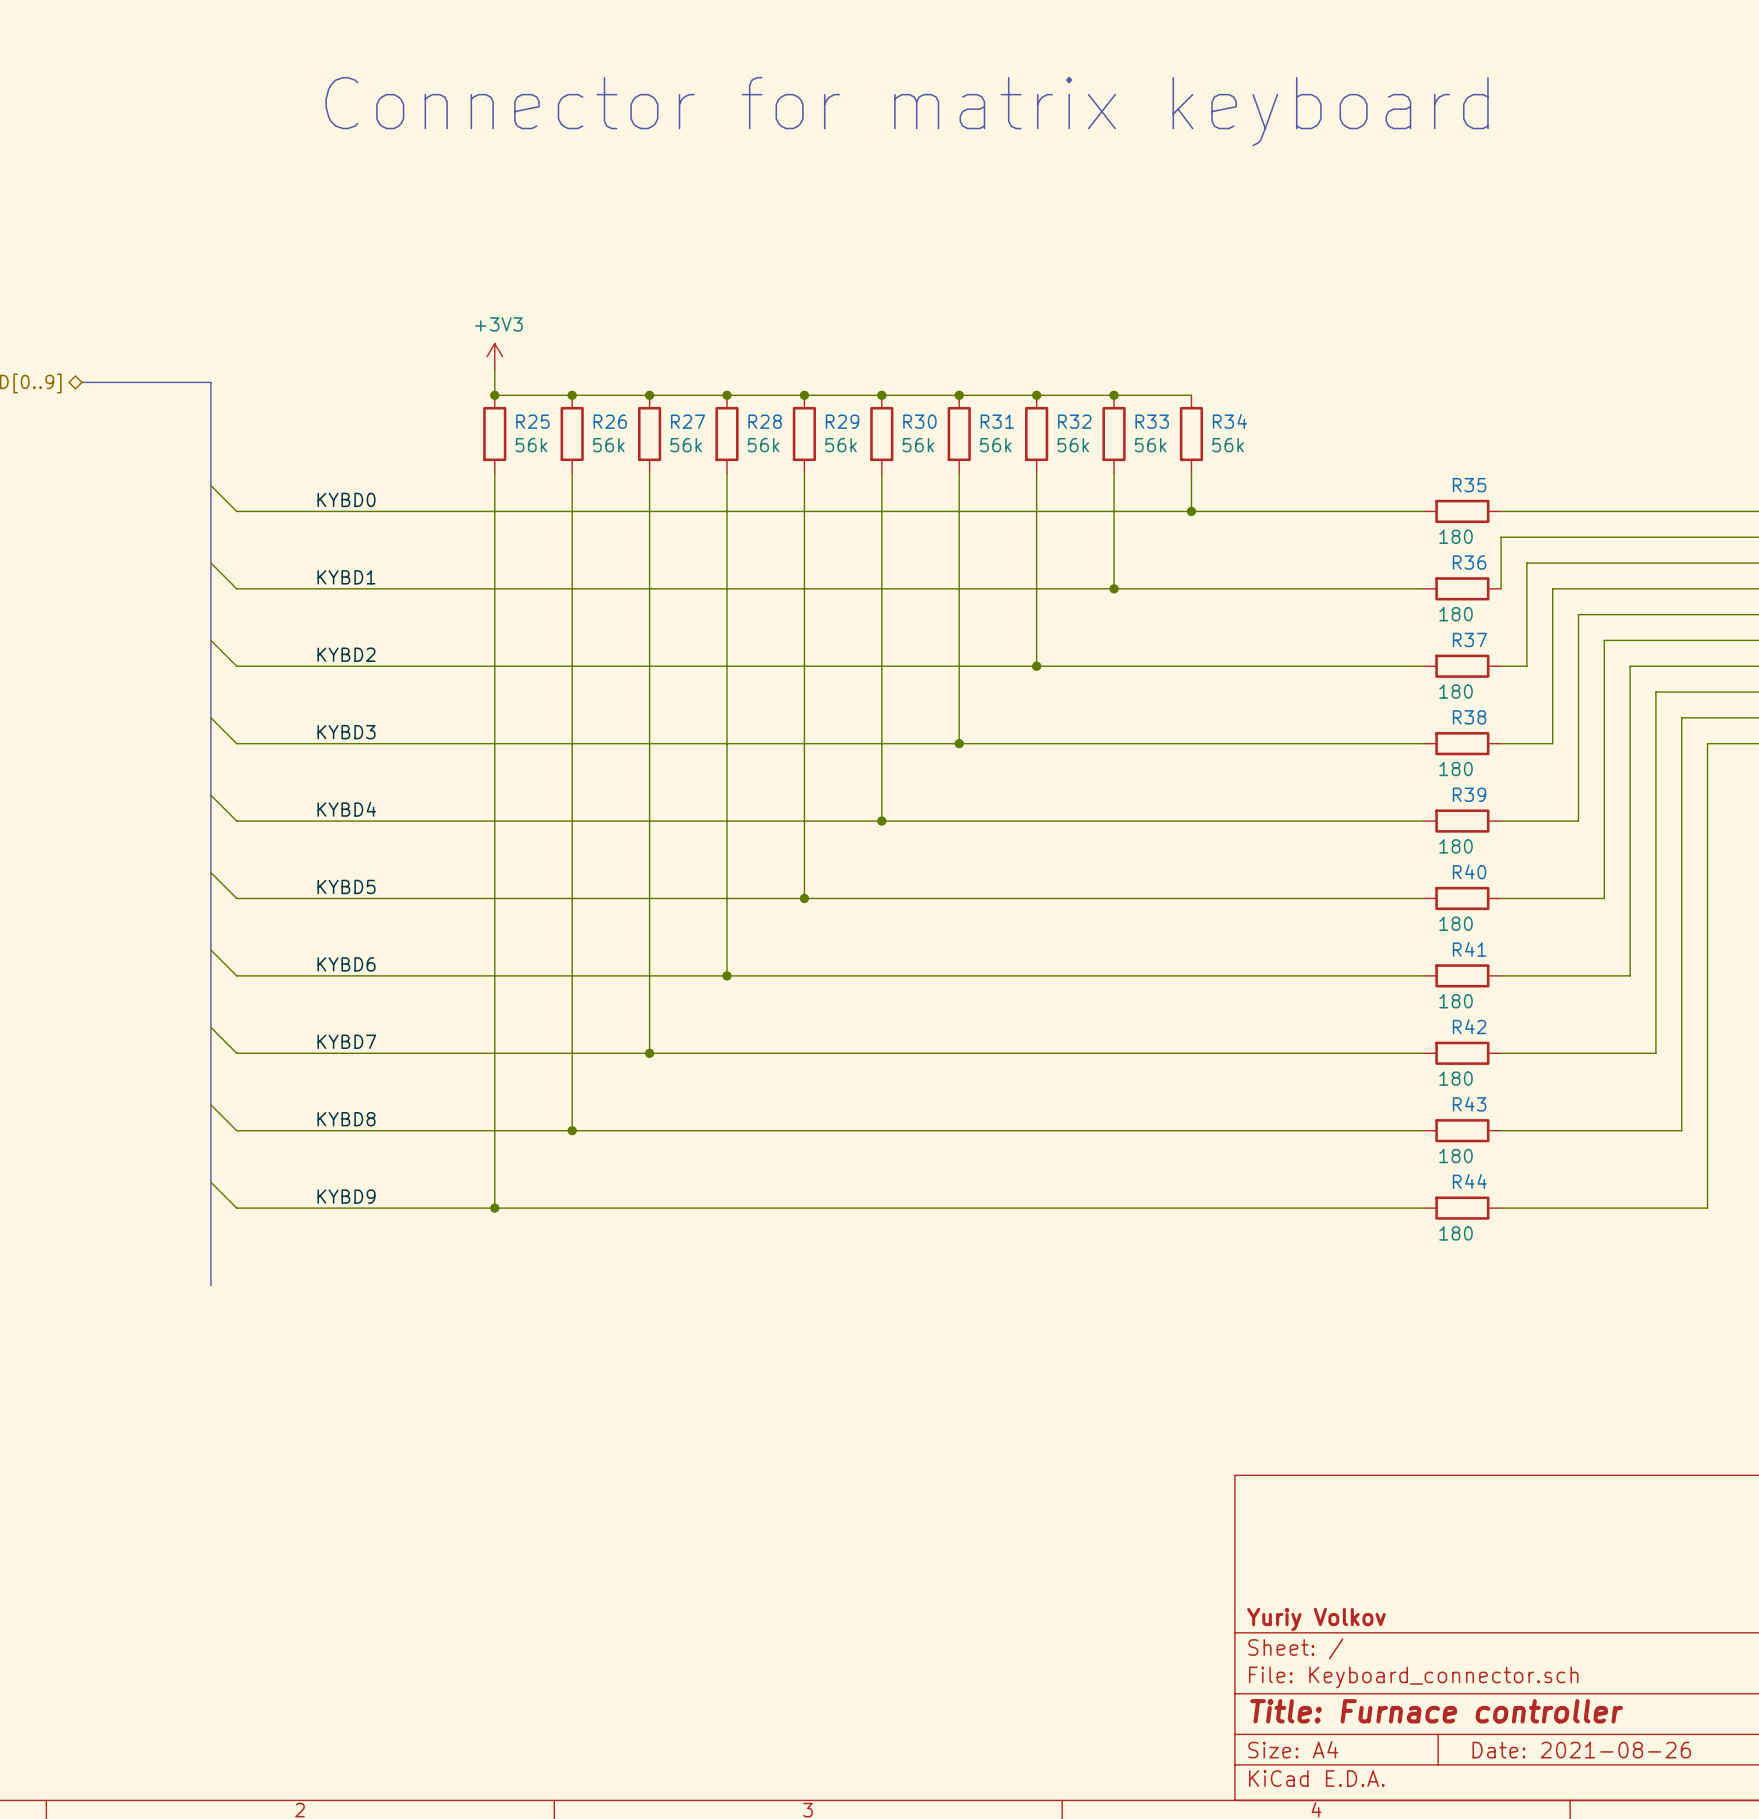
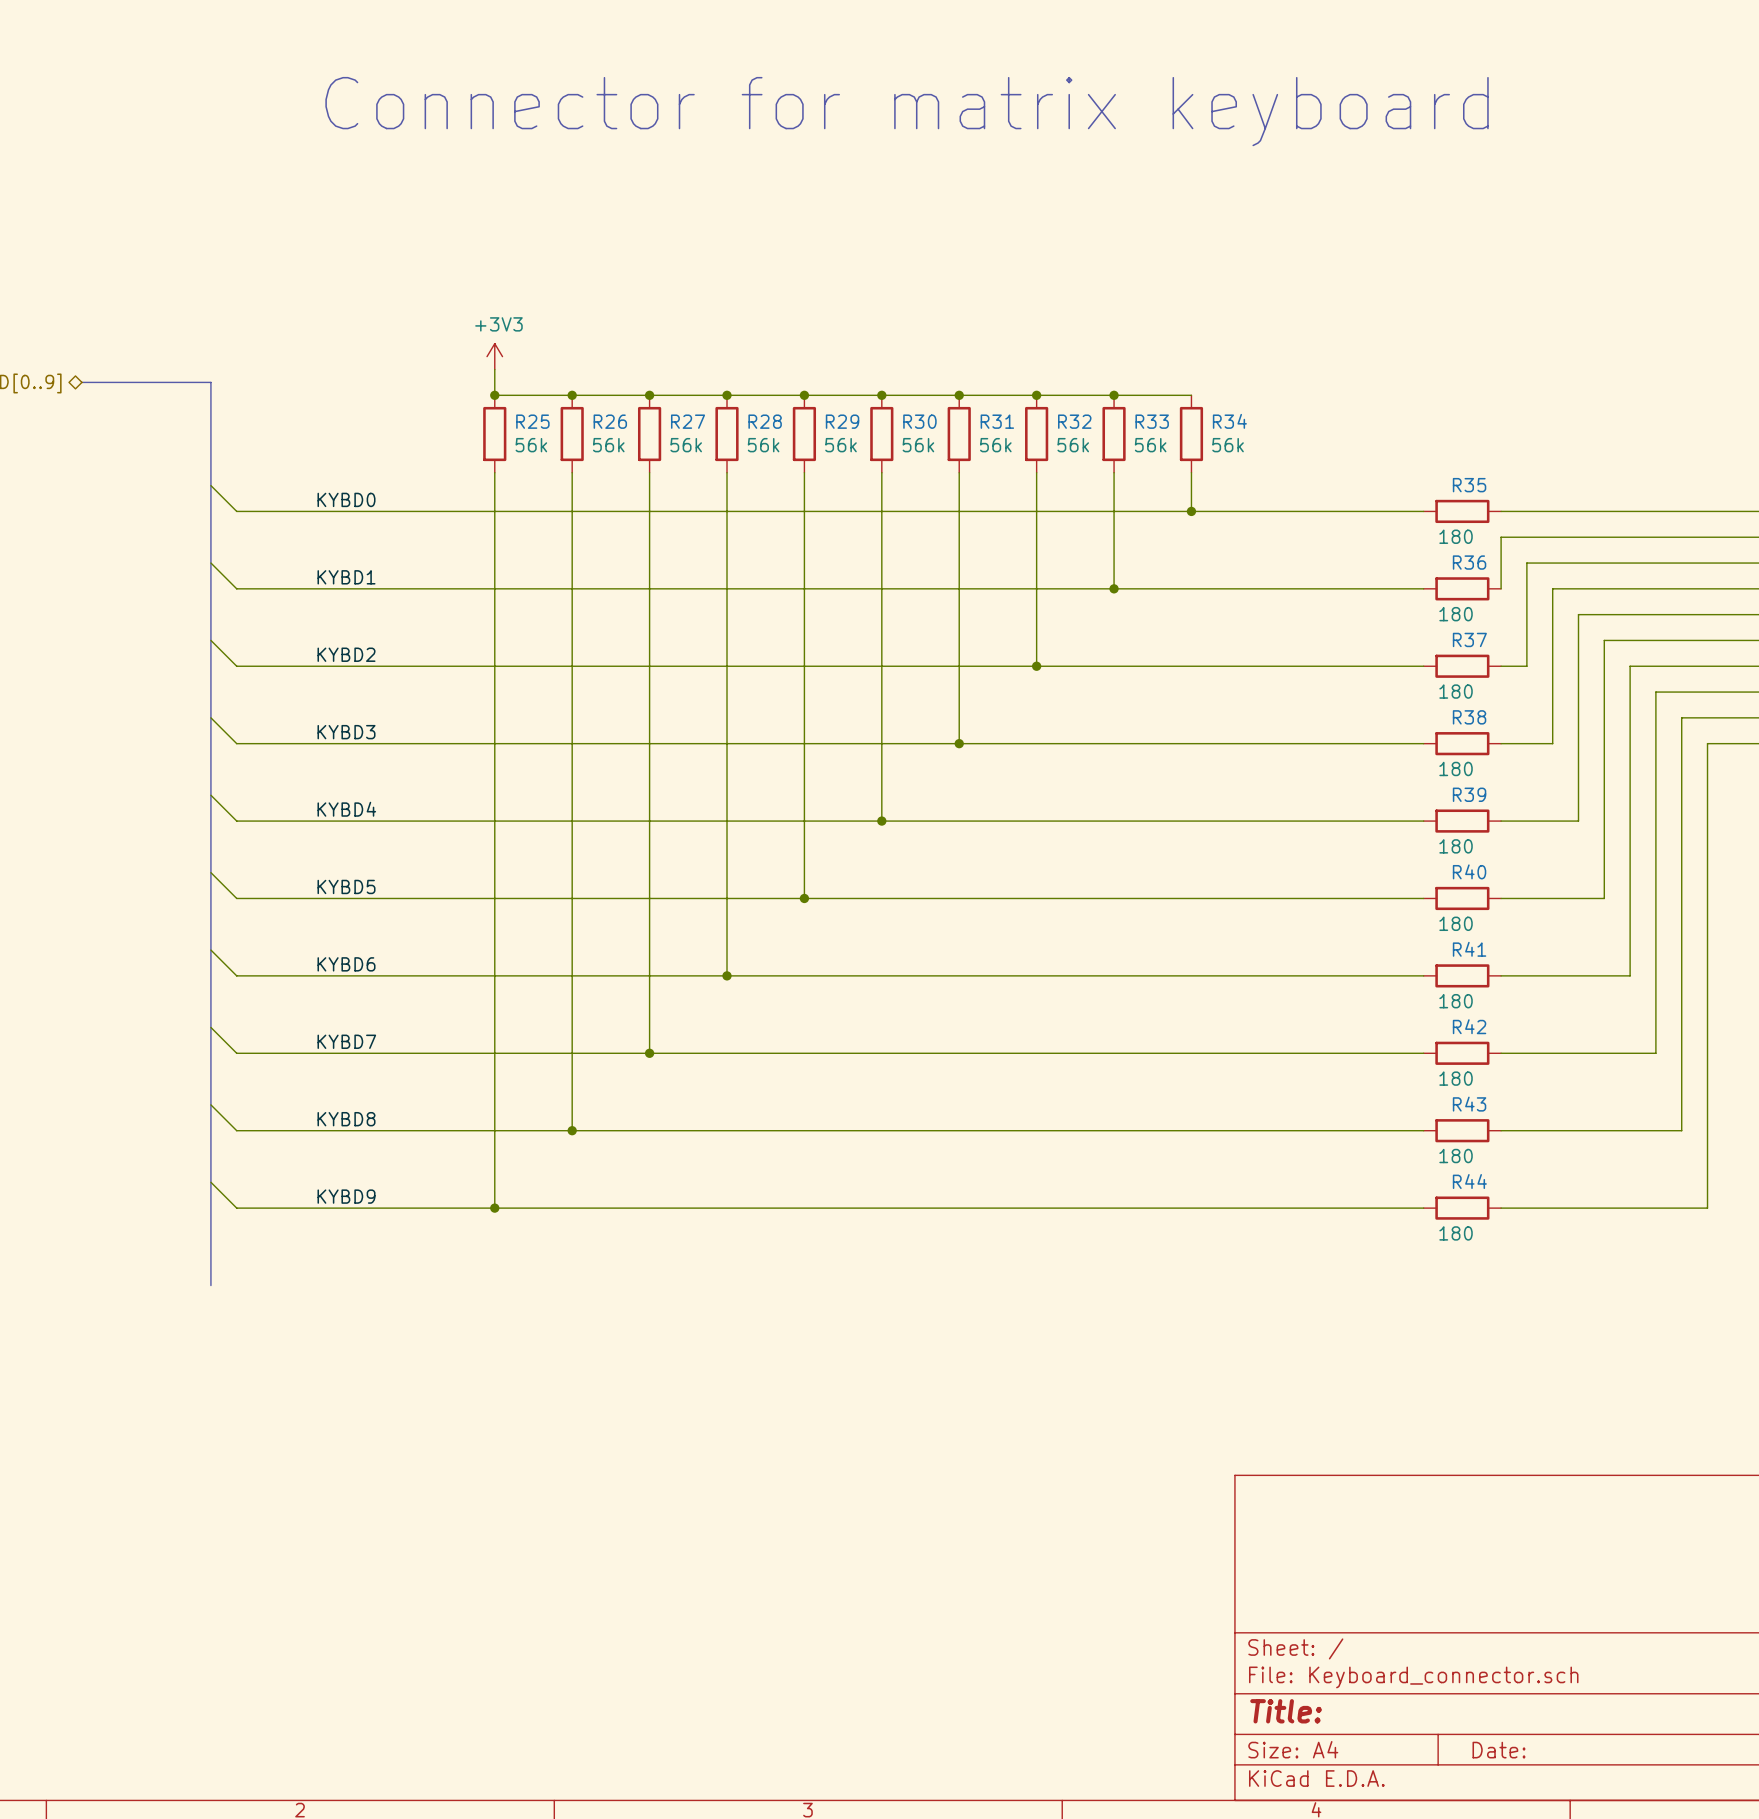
title block: Yuriy Volkov (1316, 1619) -> none
title block: Title: Furnace controller (1436, 1711) -> Title: (1286, 1711)
title block: Date: 2021-08-26 (1581, 1750) -> Date: (1499, 1750)

